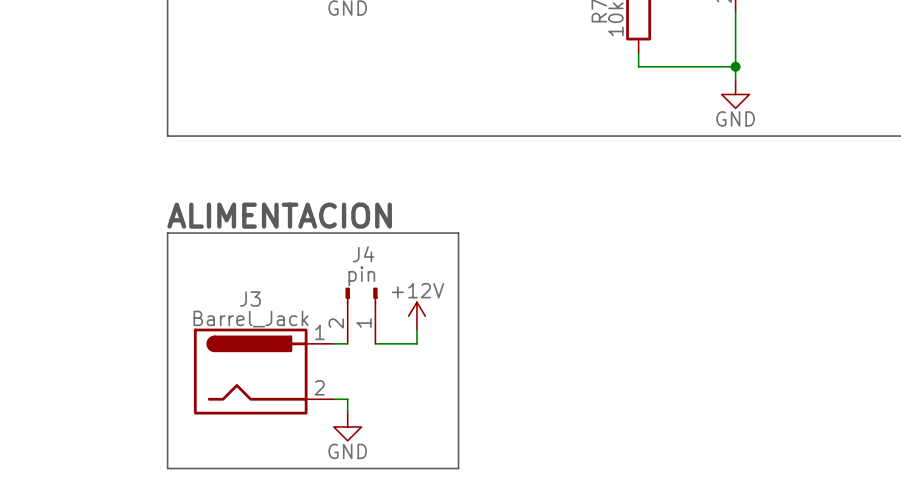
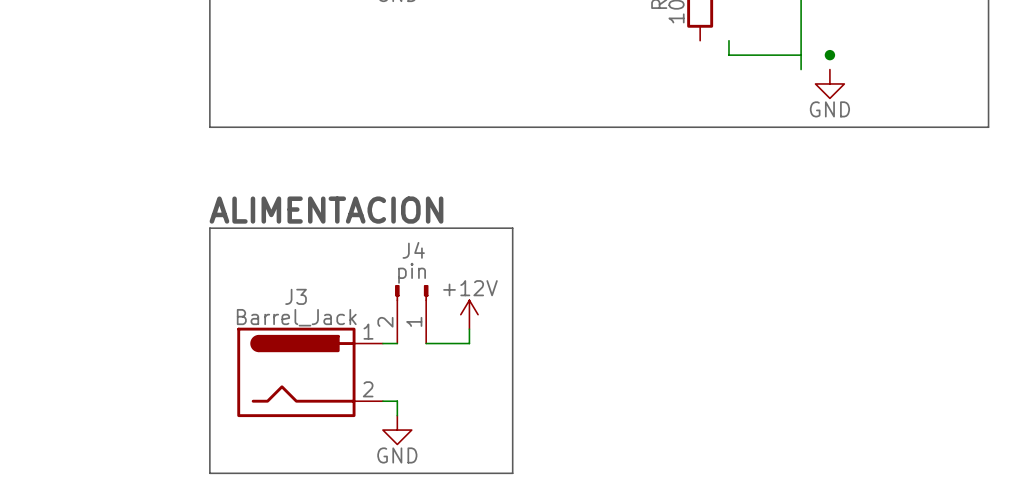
wire: (638, 52) (638, 66) (666, 66) -> (728, 40) (728, 55)
junction position: (735, 66) -> (829, 55)
power symbol position: GND (735, 94) -> GND (829, 83)

